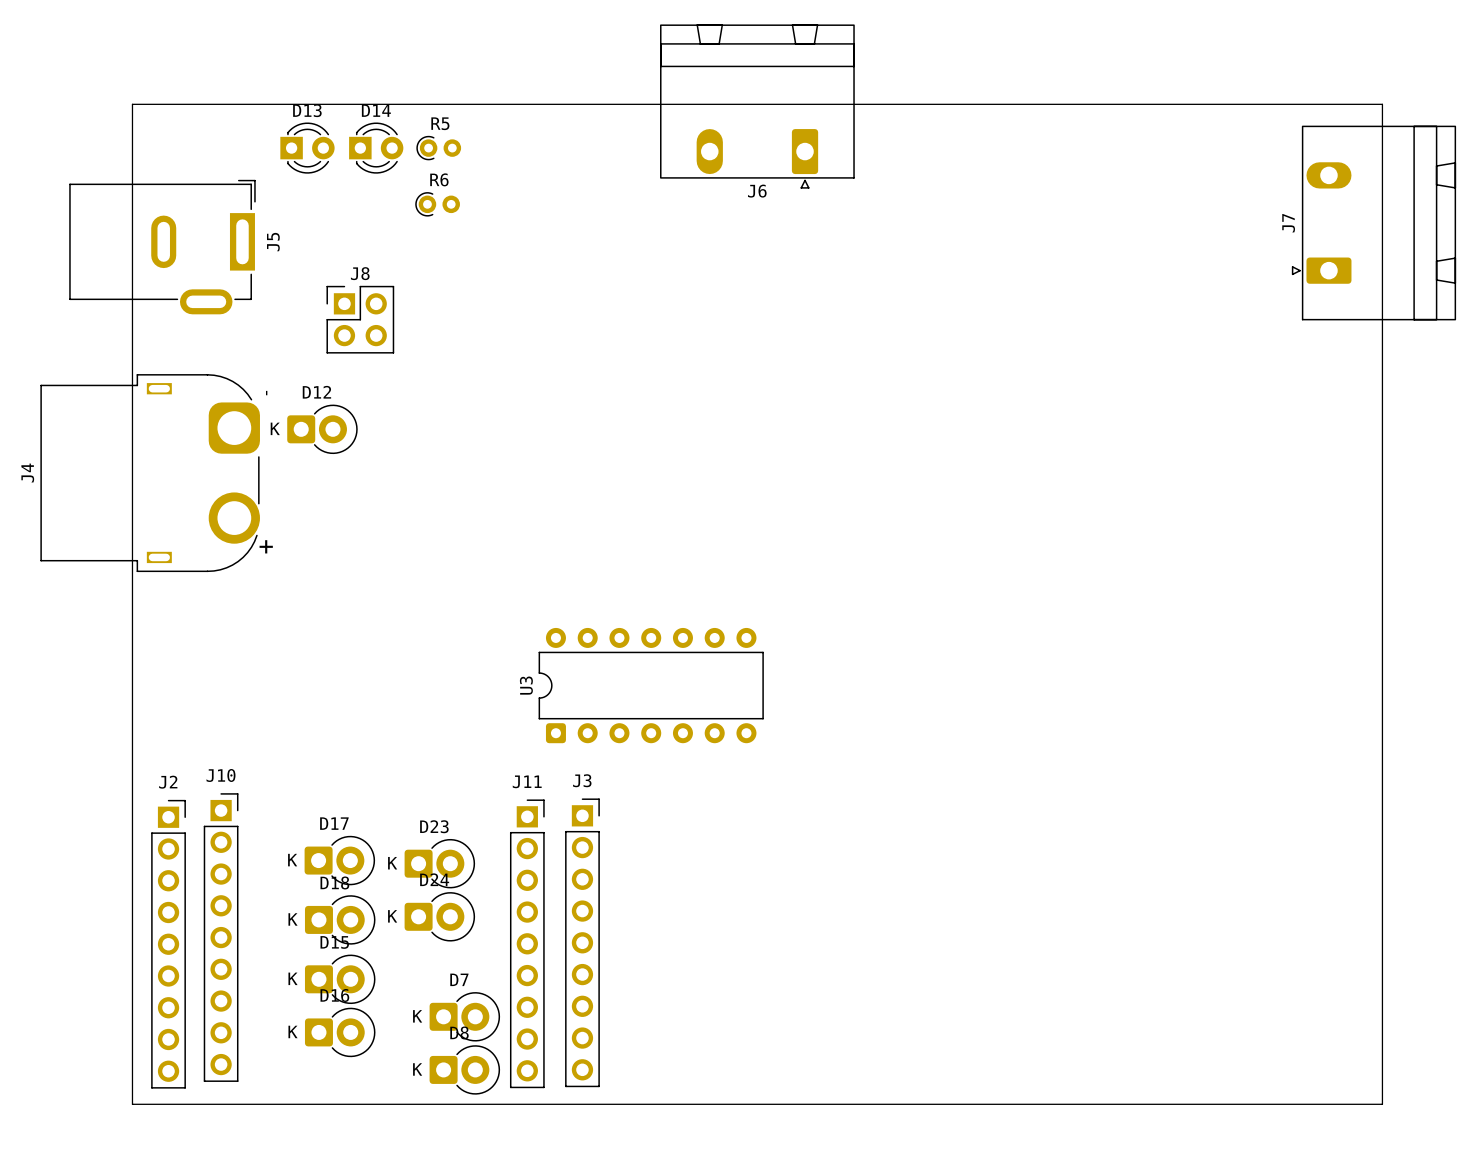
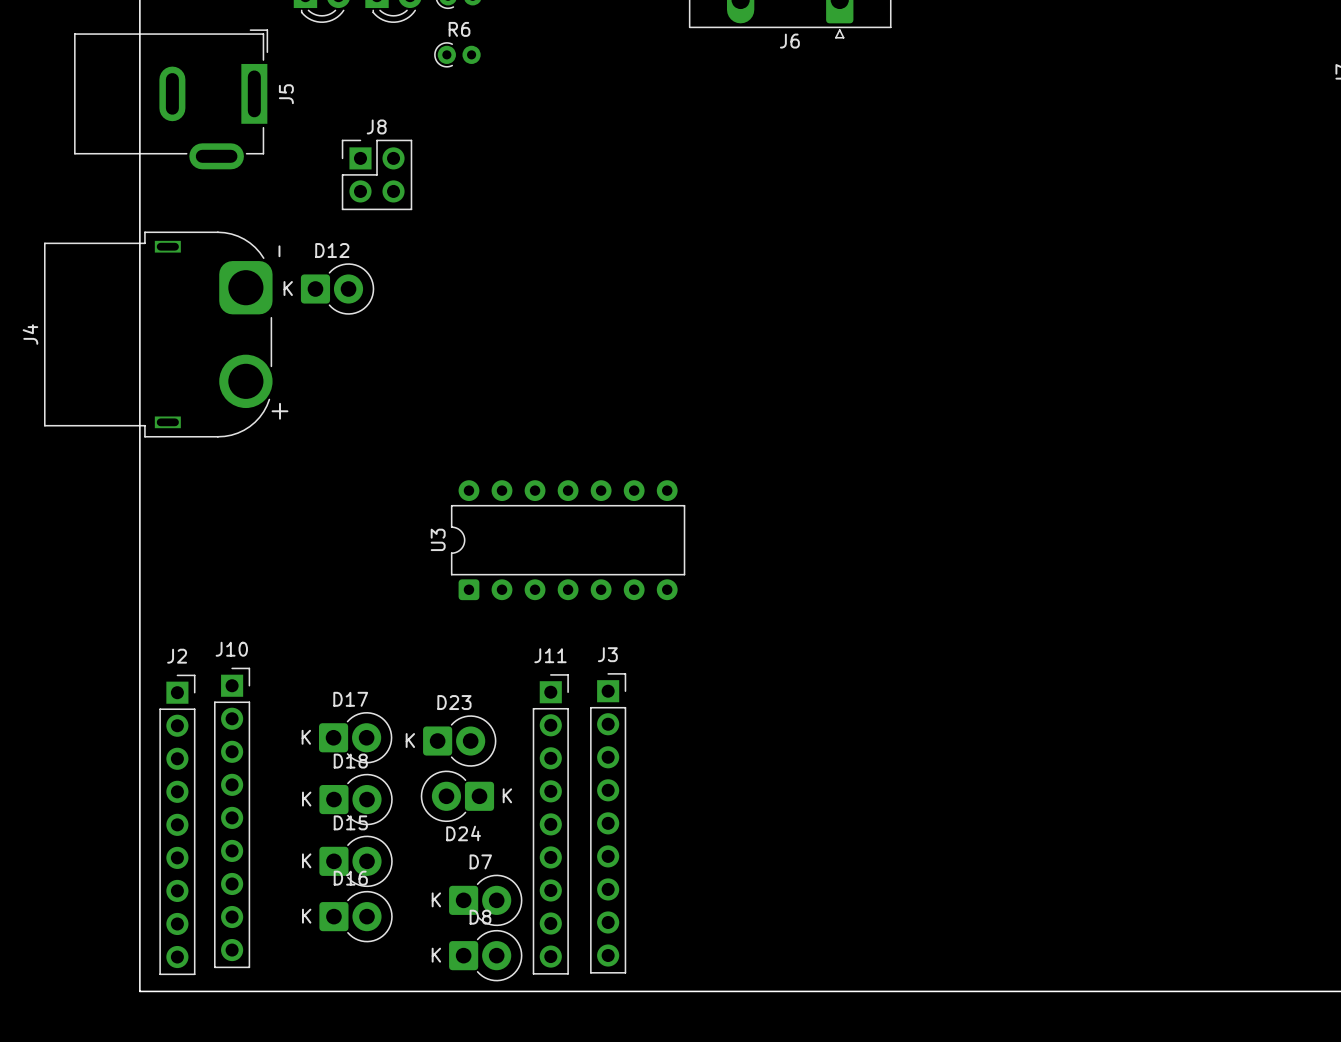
U3 position: (651, 685) -> (568, 540)
D24 rotation: 0° (439, 916) -> 180° (457, 796)

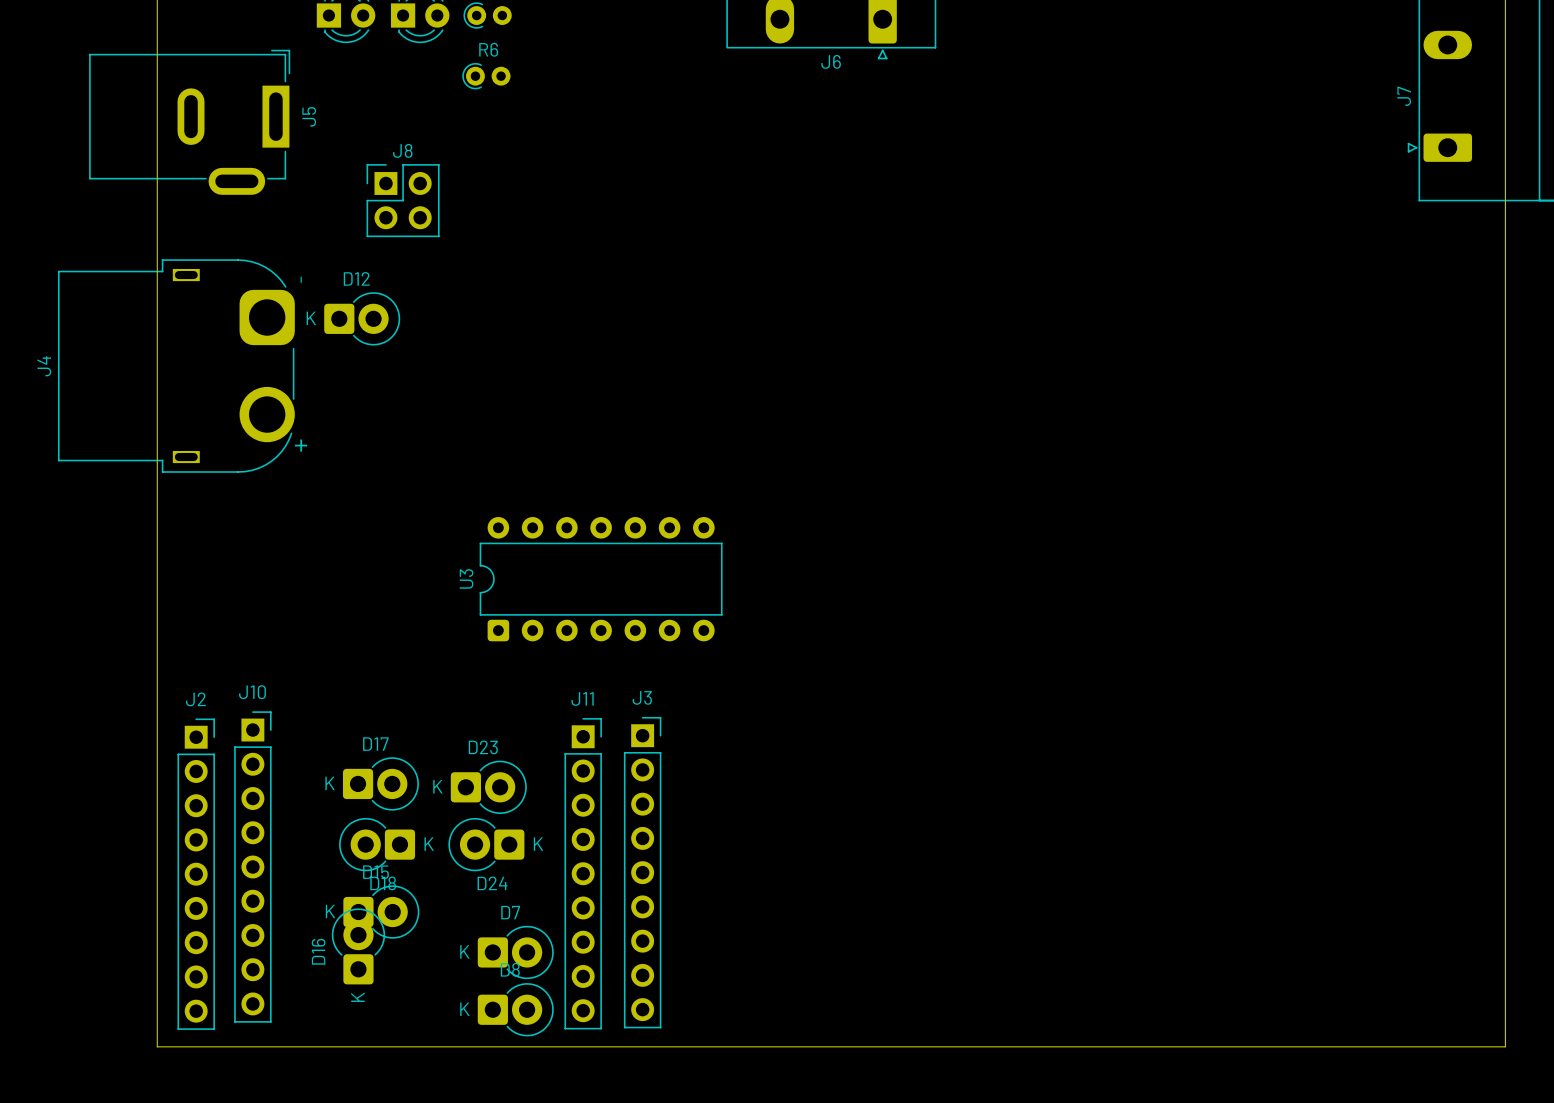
D18 rotation: 0° (356, 799) -> 180° (377, 844)
D16 rotation: 0° (356, 916) -> 90° counterclockwise (358, 946)

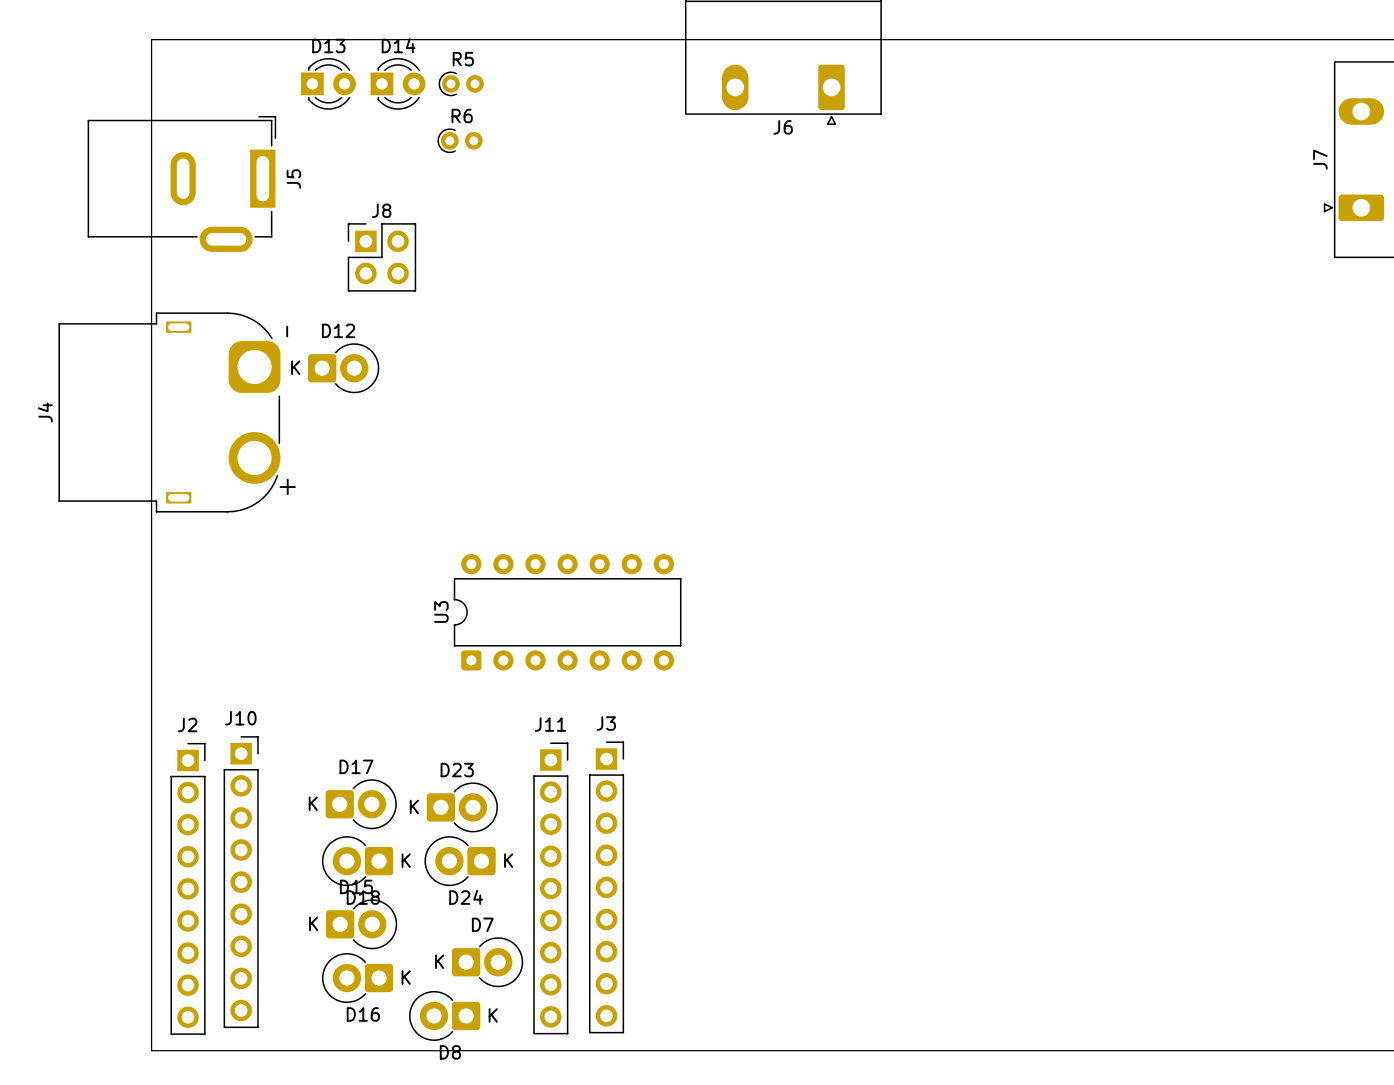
D16 rotation: 0° (358, 946) -> 90° counterclockwise (357, 978)
D8 rotation: 0° (515, 1009) -> 180° (444, 1015)
D8 position: (515, 1009) -> (444, 1015)

